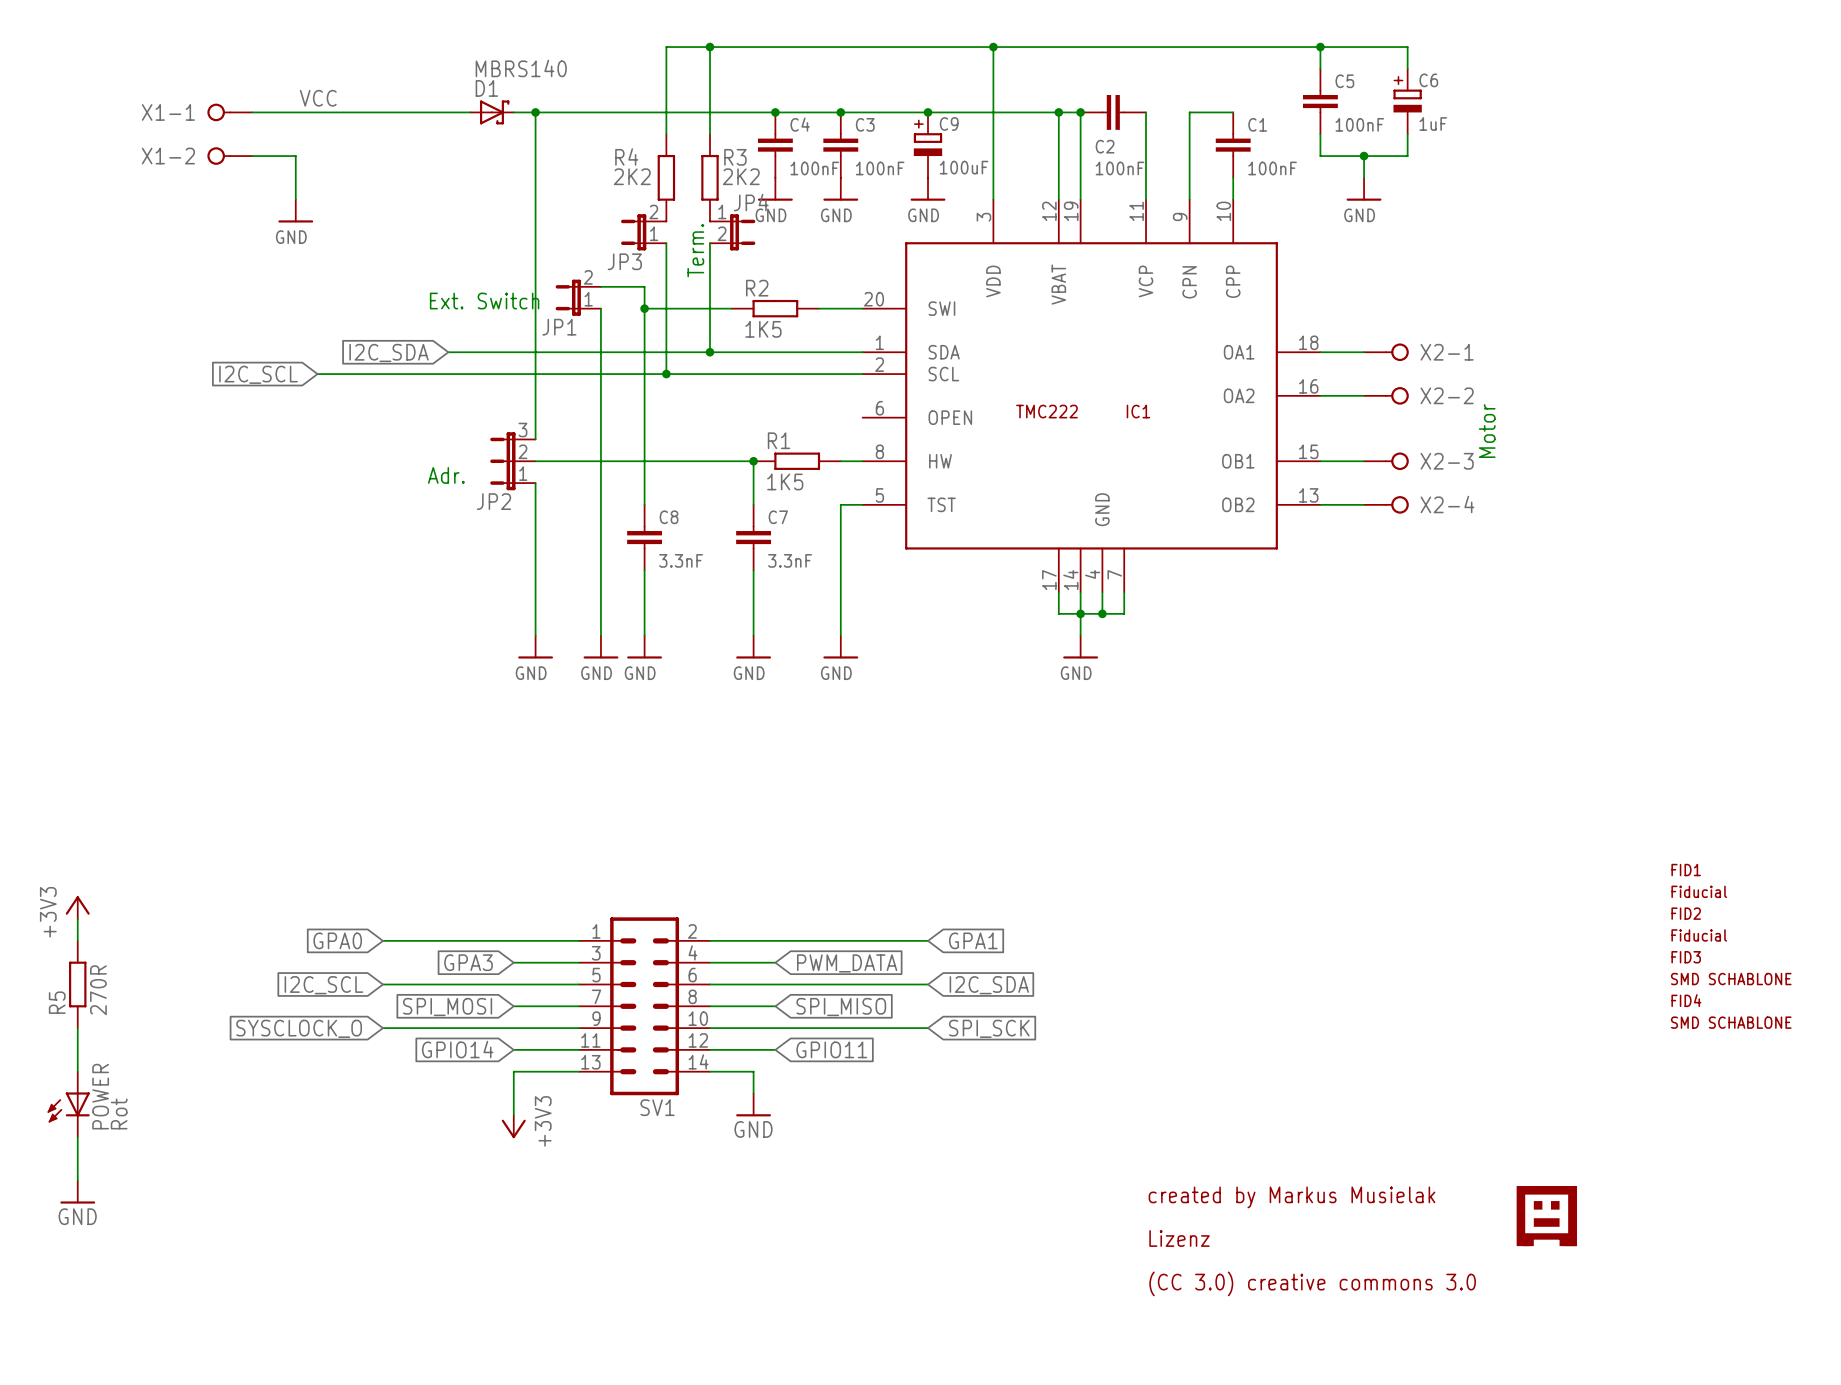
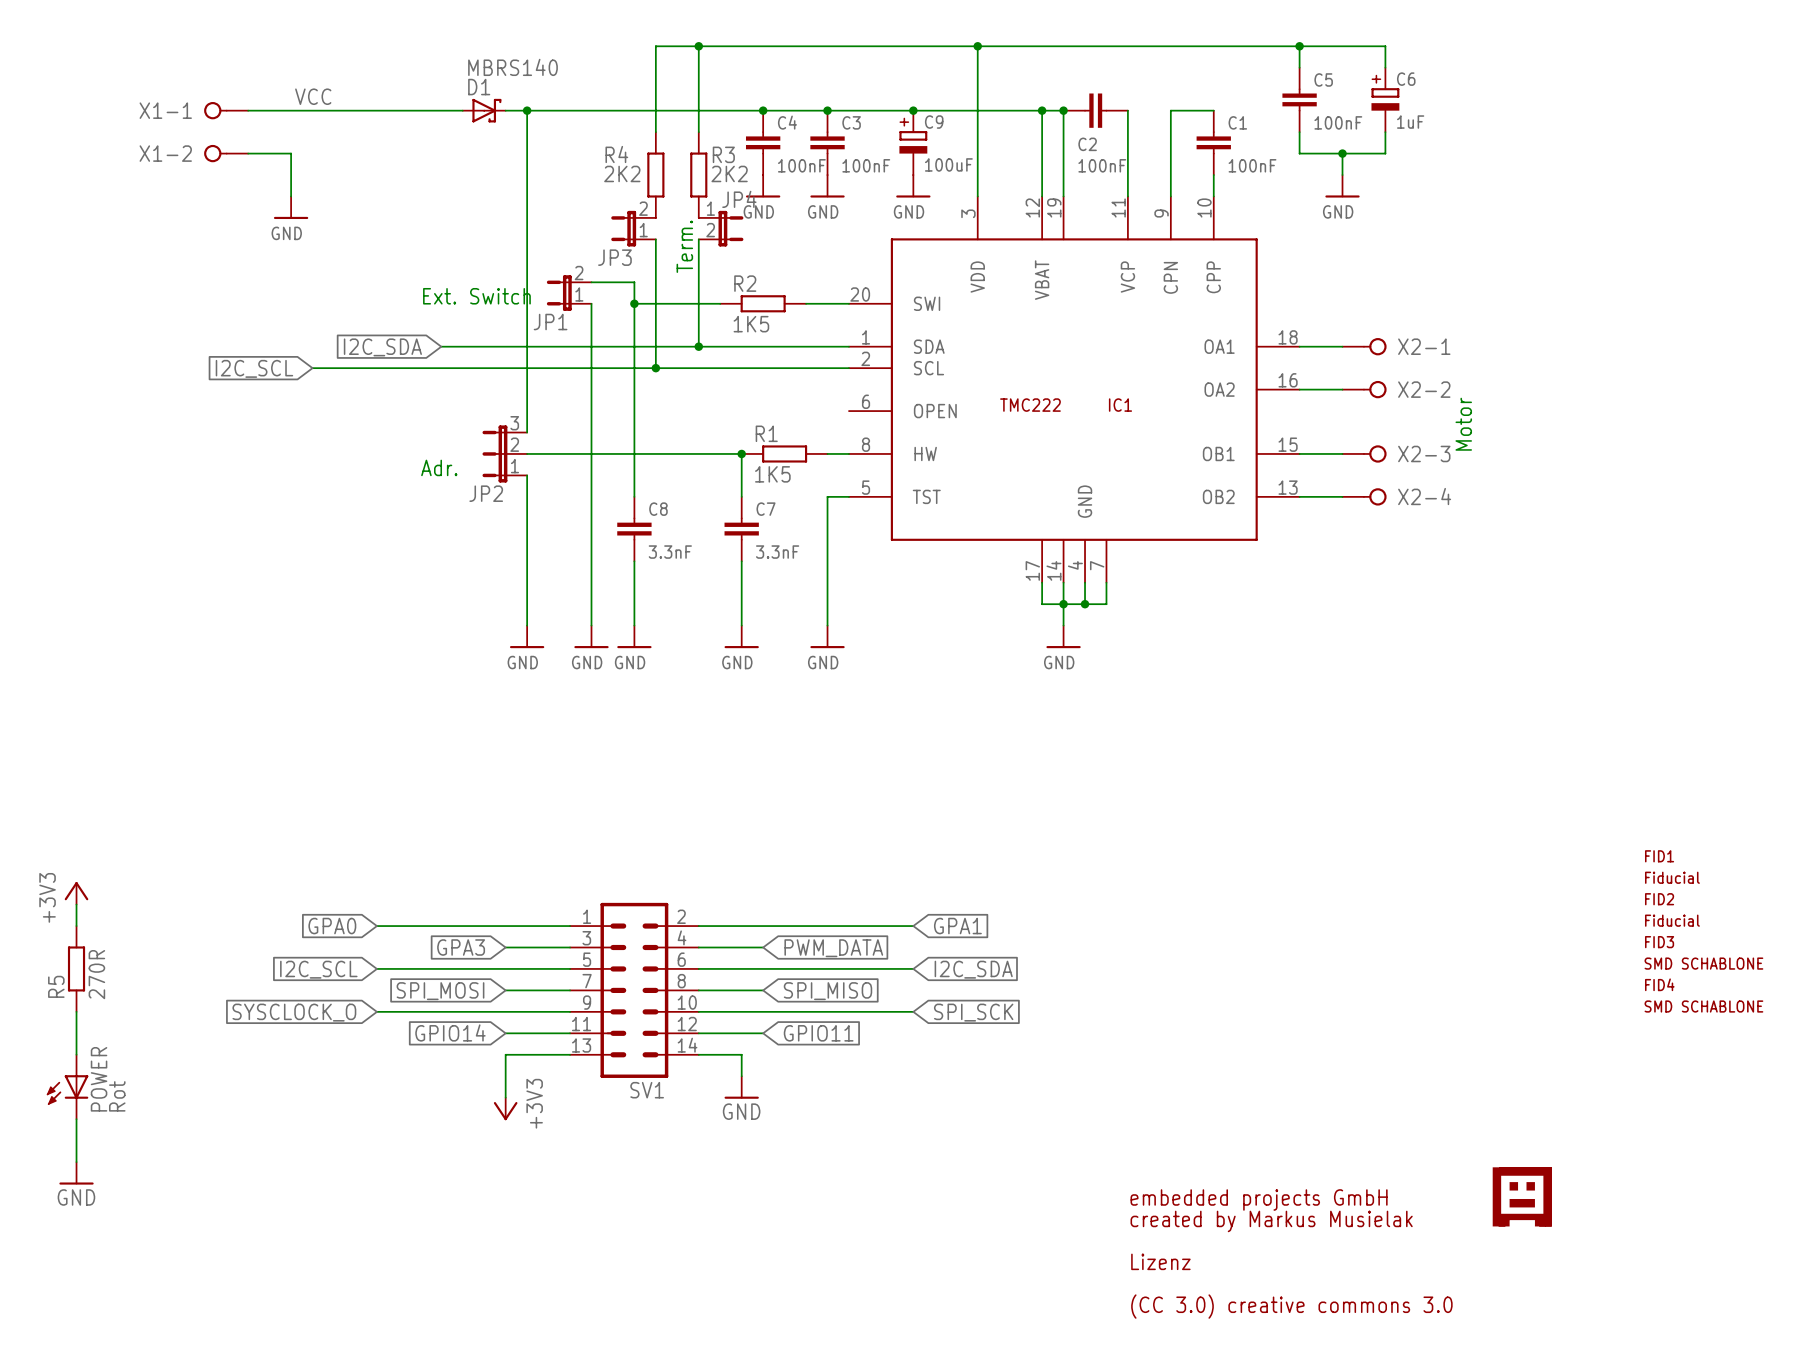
text: created by Markus Musielak (1292, 1197) -> none
text: none -> embedded projects GmbH (1259, 1199)
text: Lizenz (1179, 1238) -> created by Markus Musielak (1271, 1221)
text: (CC 3.0) creative commons 3.0 (1312, 1283) -> Lizenz (1160, 1261)
text: none -> (CC 3.0) creative commons 3.0 (1291, 1306)

